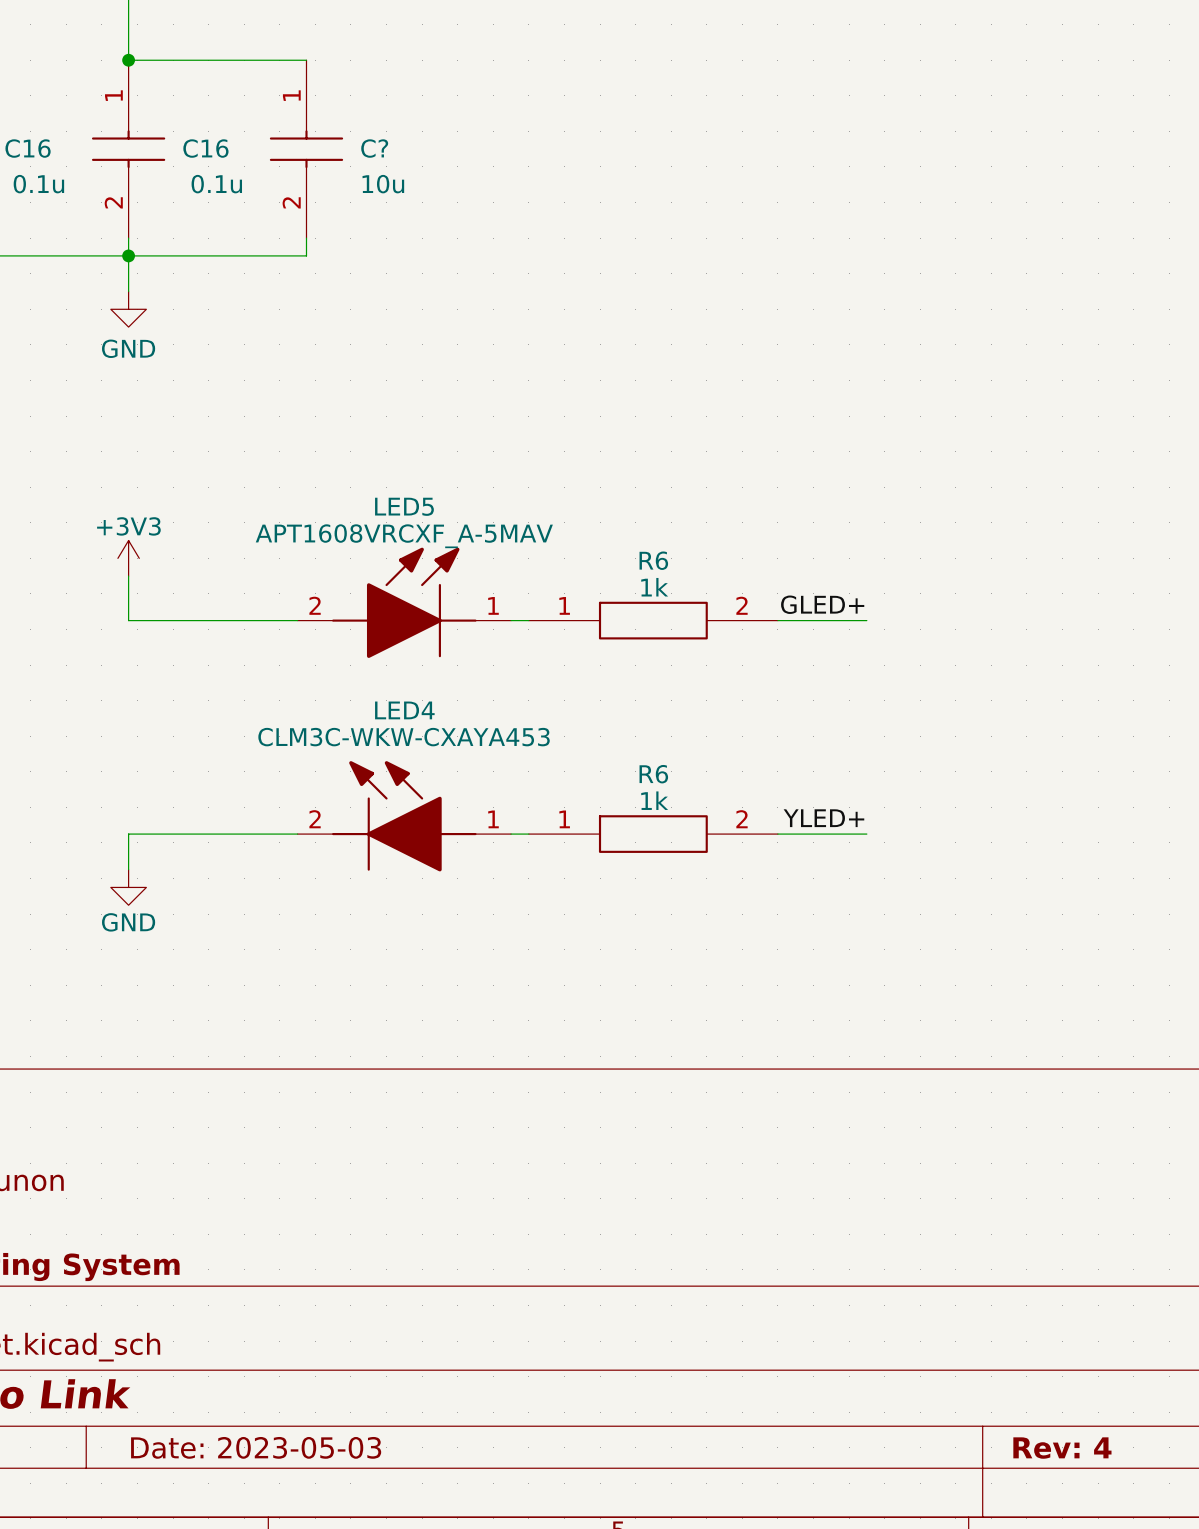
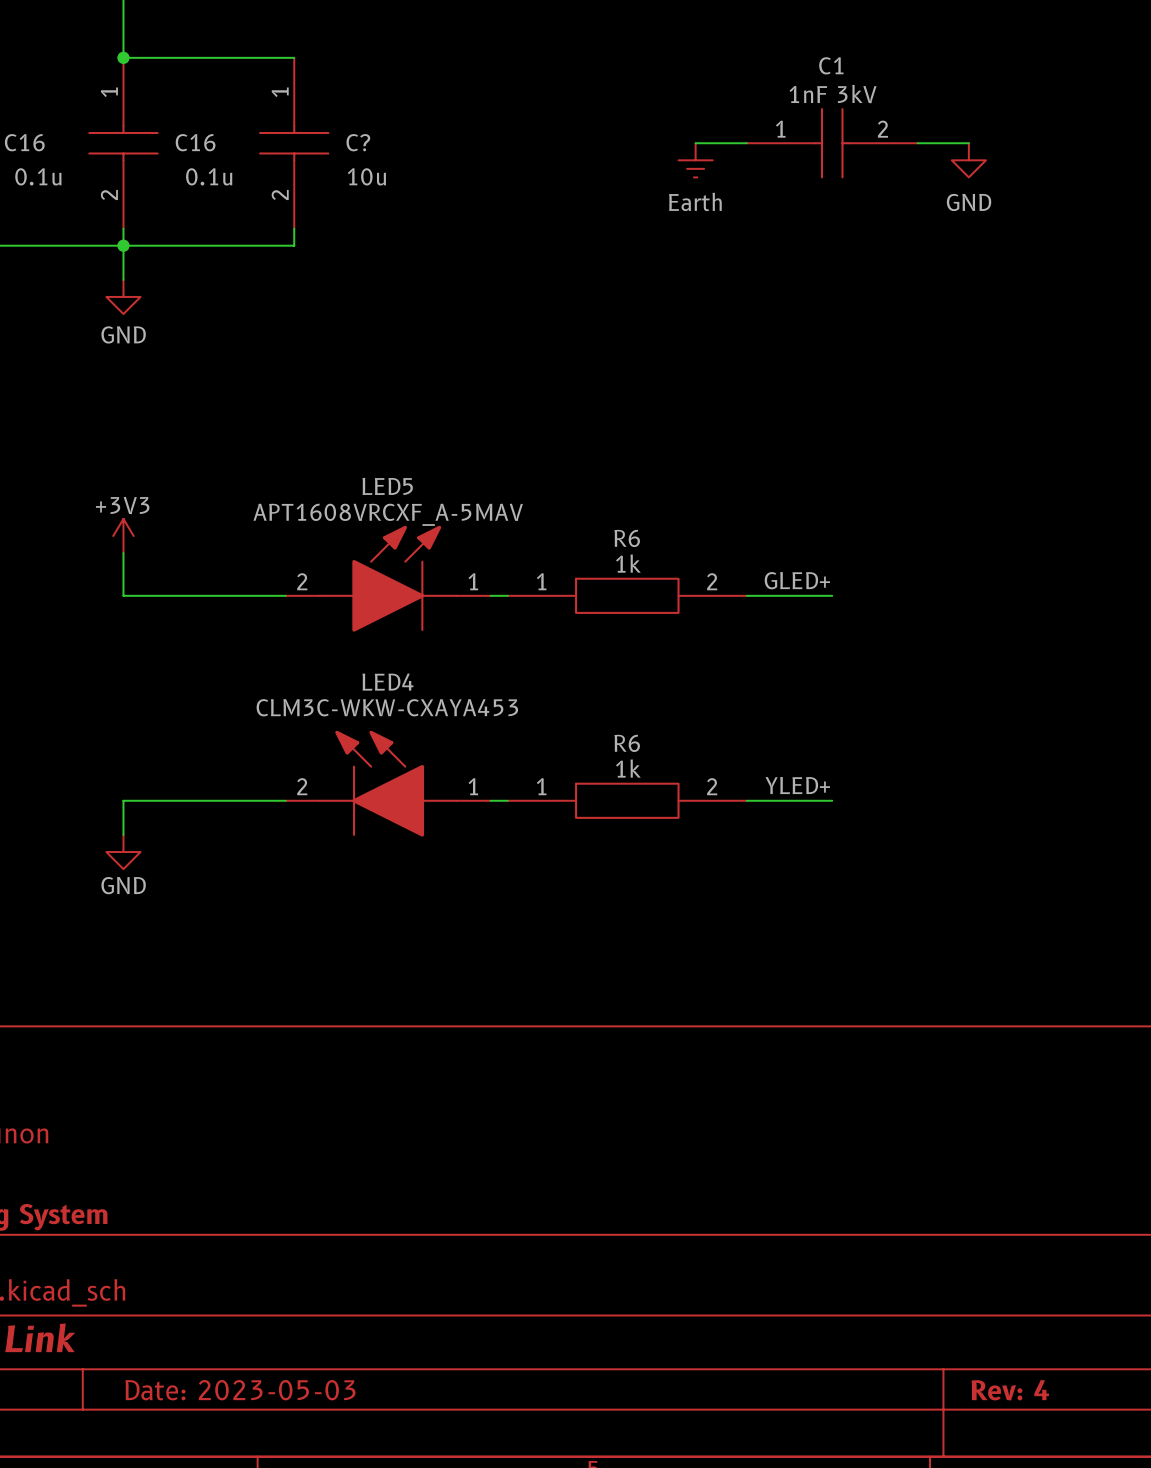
wire: none -> (695, 143) (746, 143)
C1: none -> 1nF 3kV (832, 143)
wire: none -> (917, 143) (968, 143)
power symbol: none -> Earth (695, 160)
power symbol: none -> GND (968, 160)

